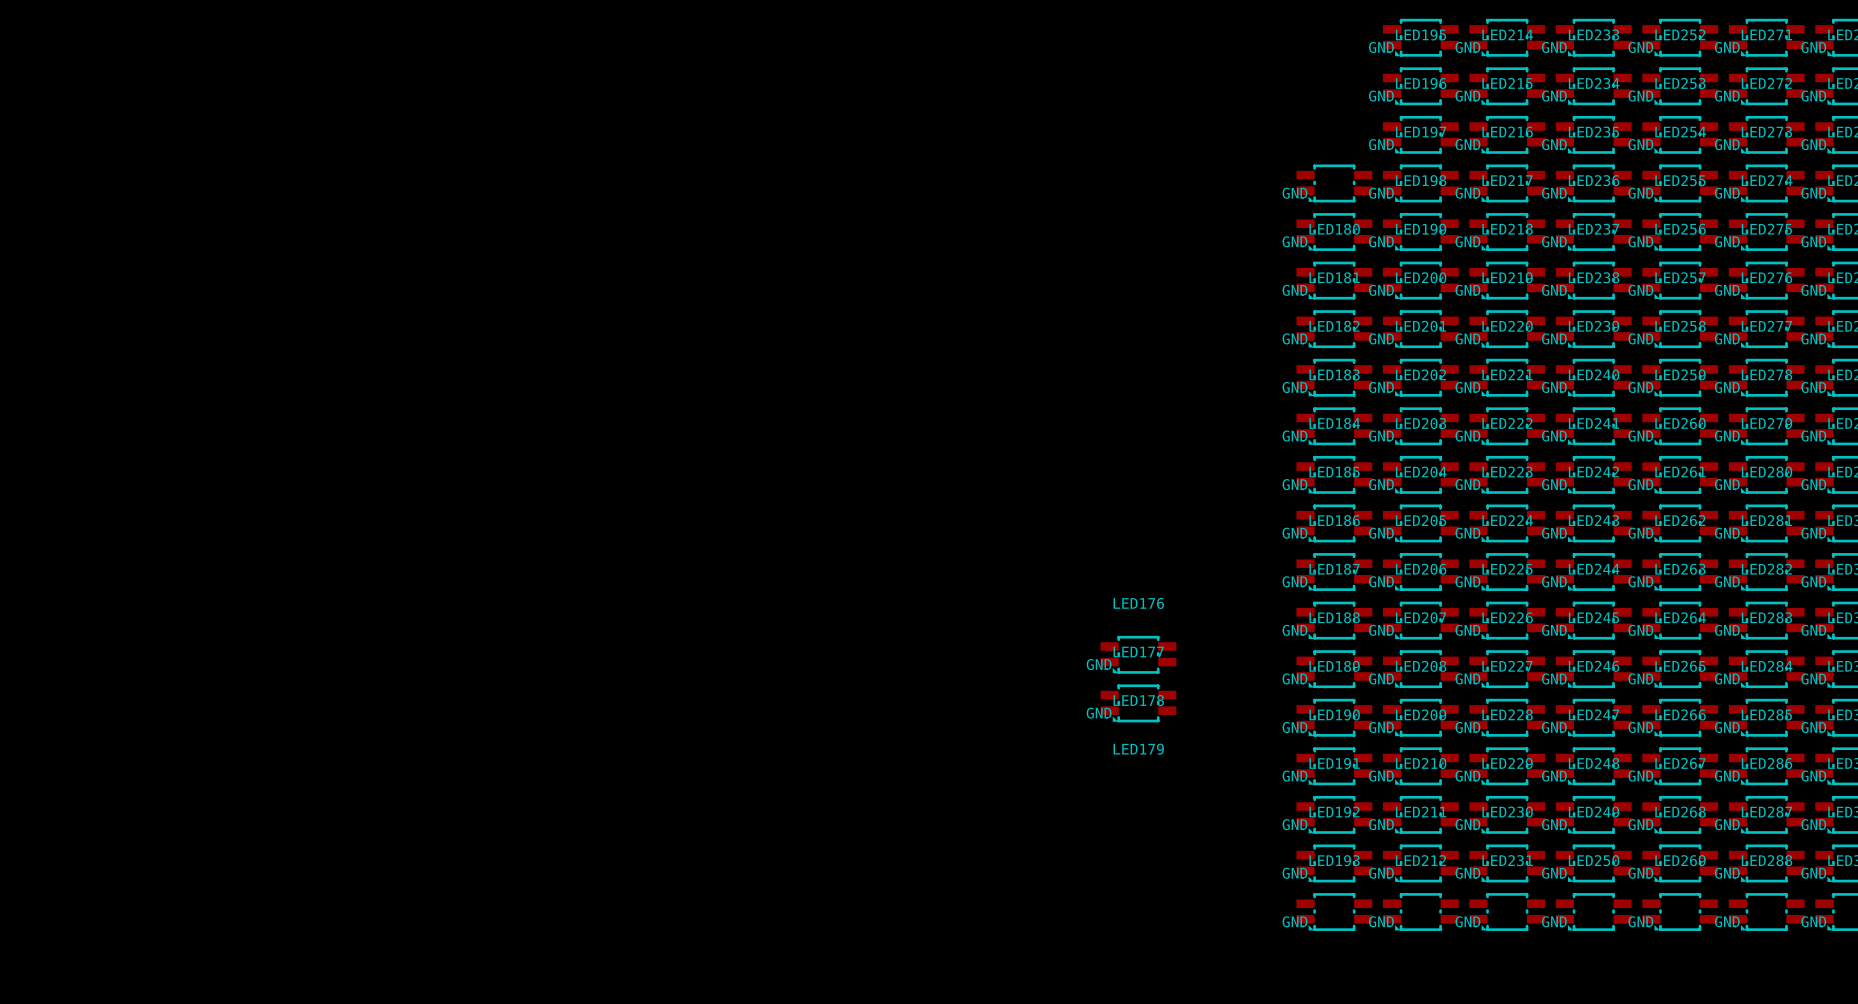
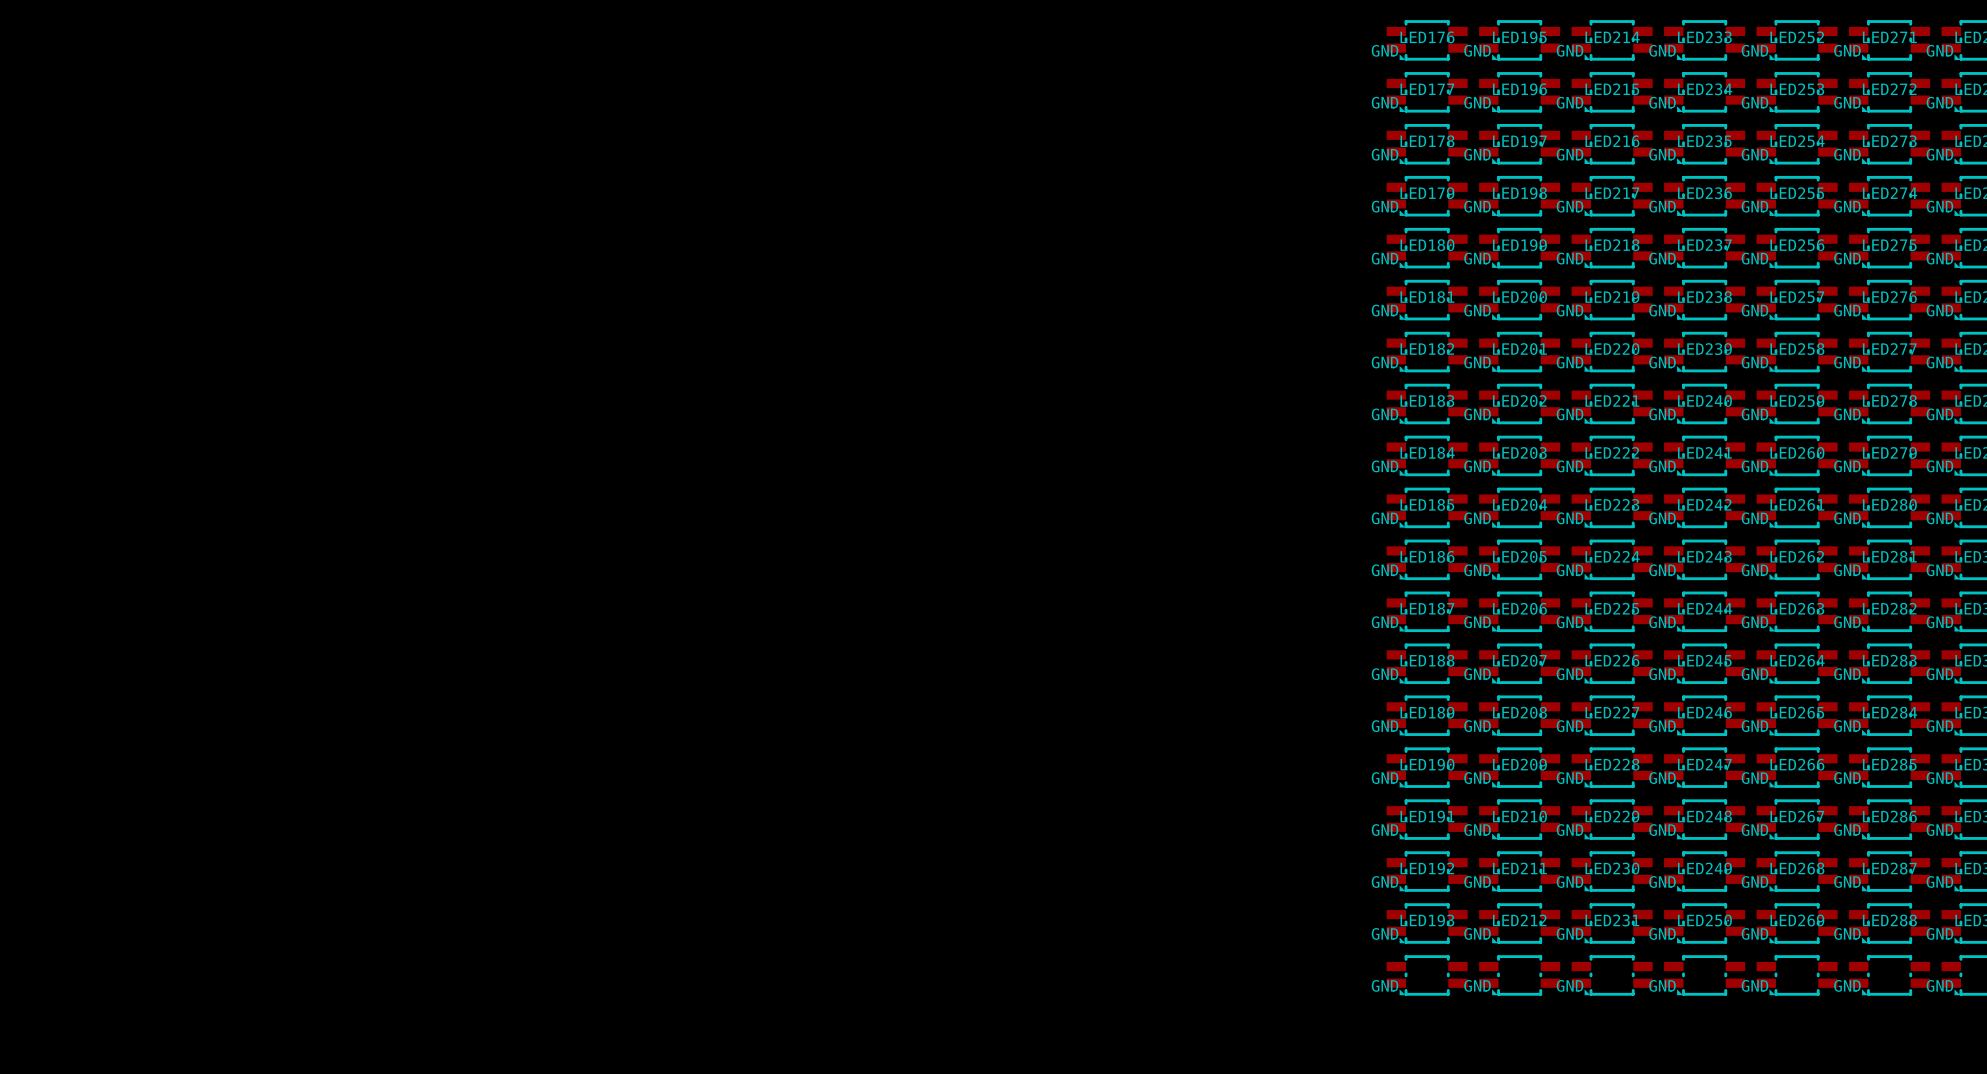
part: none -> (1427, 40)
LED176 position: (1138, 654) -> (1427, 92)
LED178 name position: LED178 (1138, 700) -> LED178 (1427, 141)
LED177 position: (1138, 703) -> (1427, 144)
LED179 name position: LED179 (1138, 749) -> LED179 (1427, 193)

